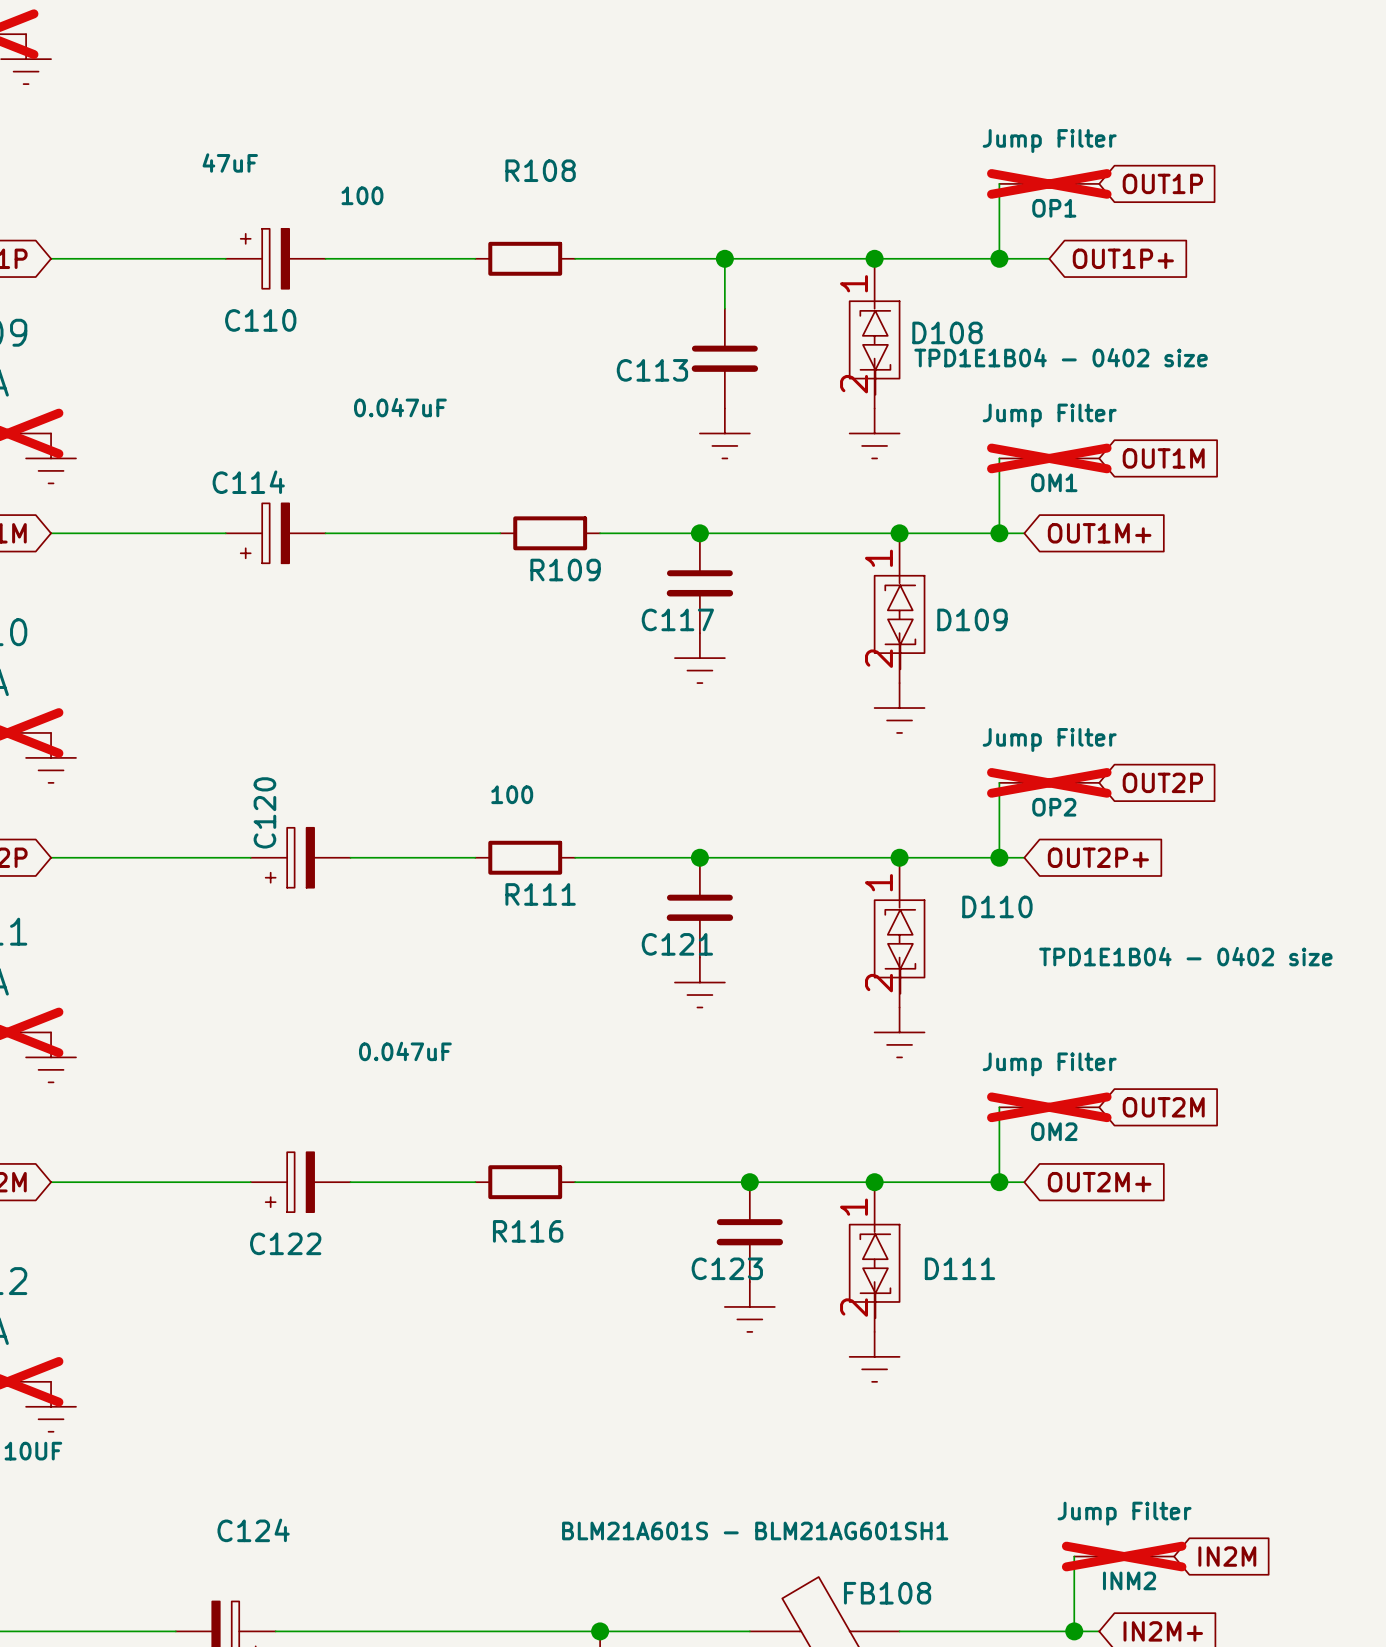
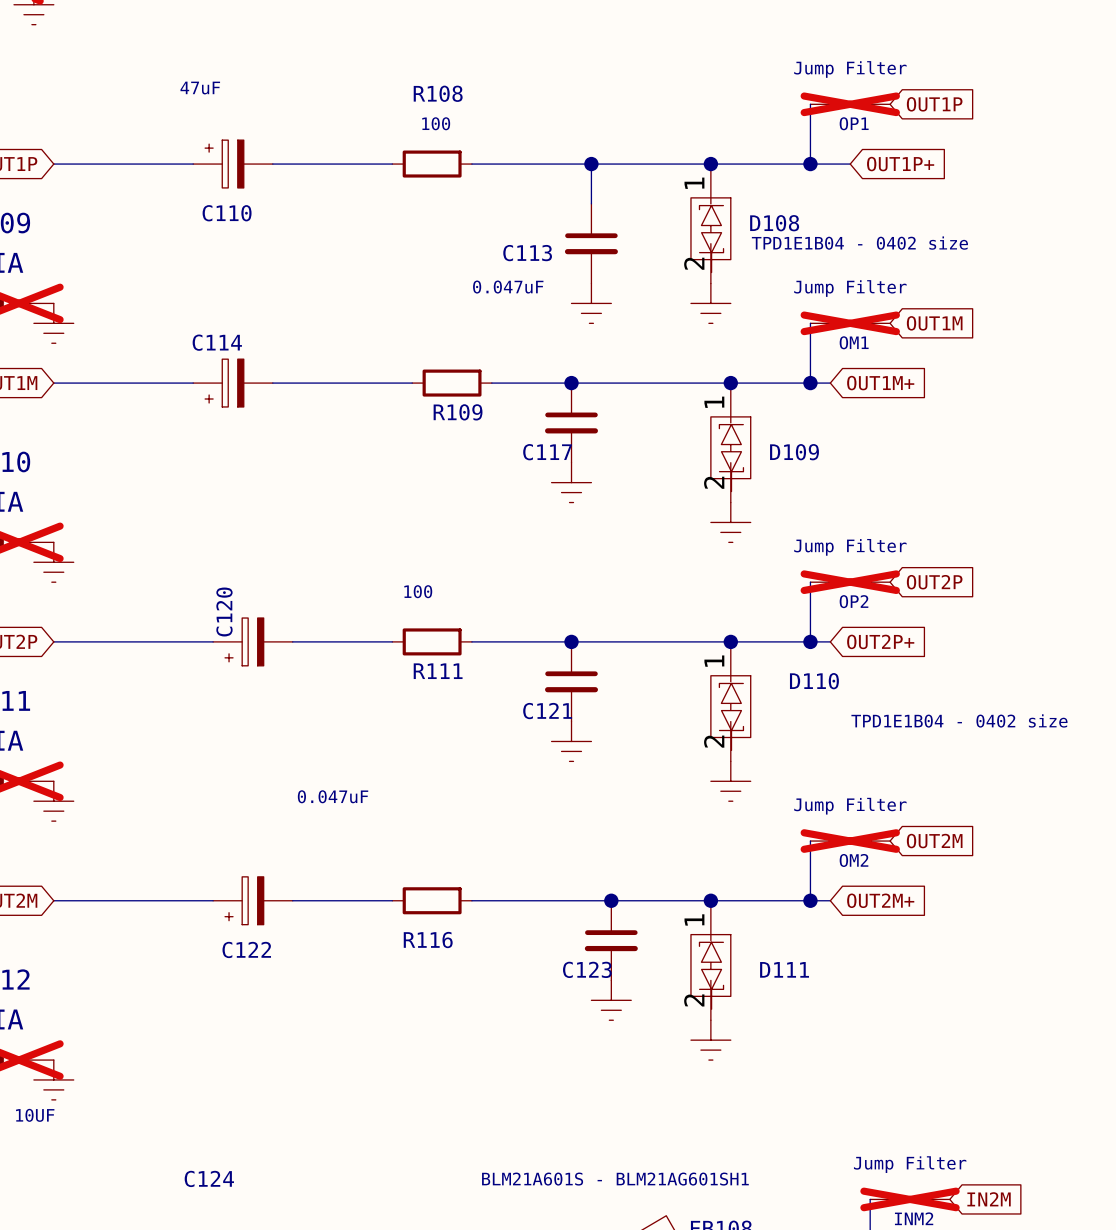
R108 value position: 100 (362, 195) -> 100 (436, 123)
C113 value position: 0.047uF (400, 407) -> 0.047uF (508, 287)

